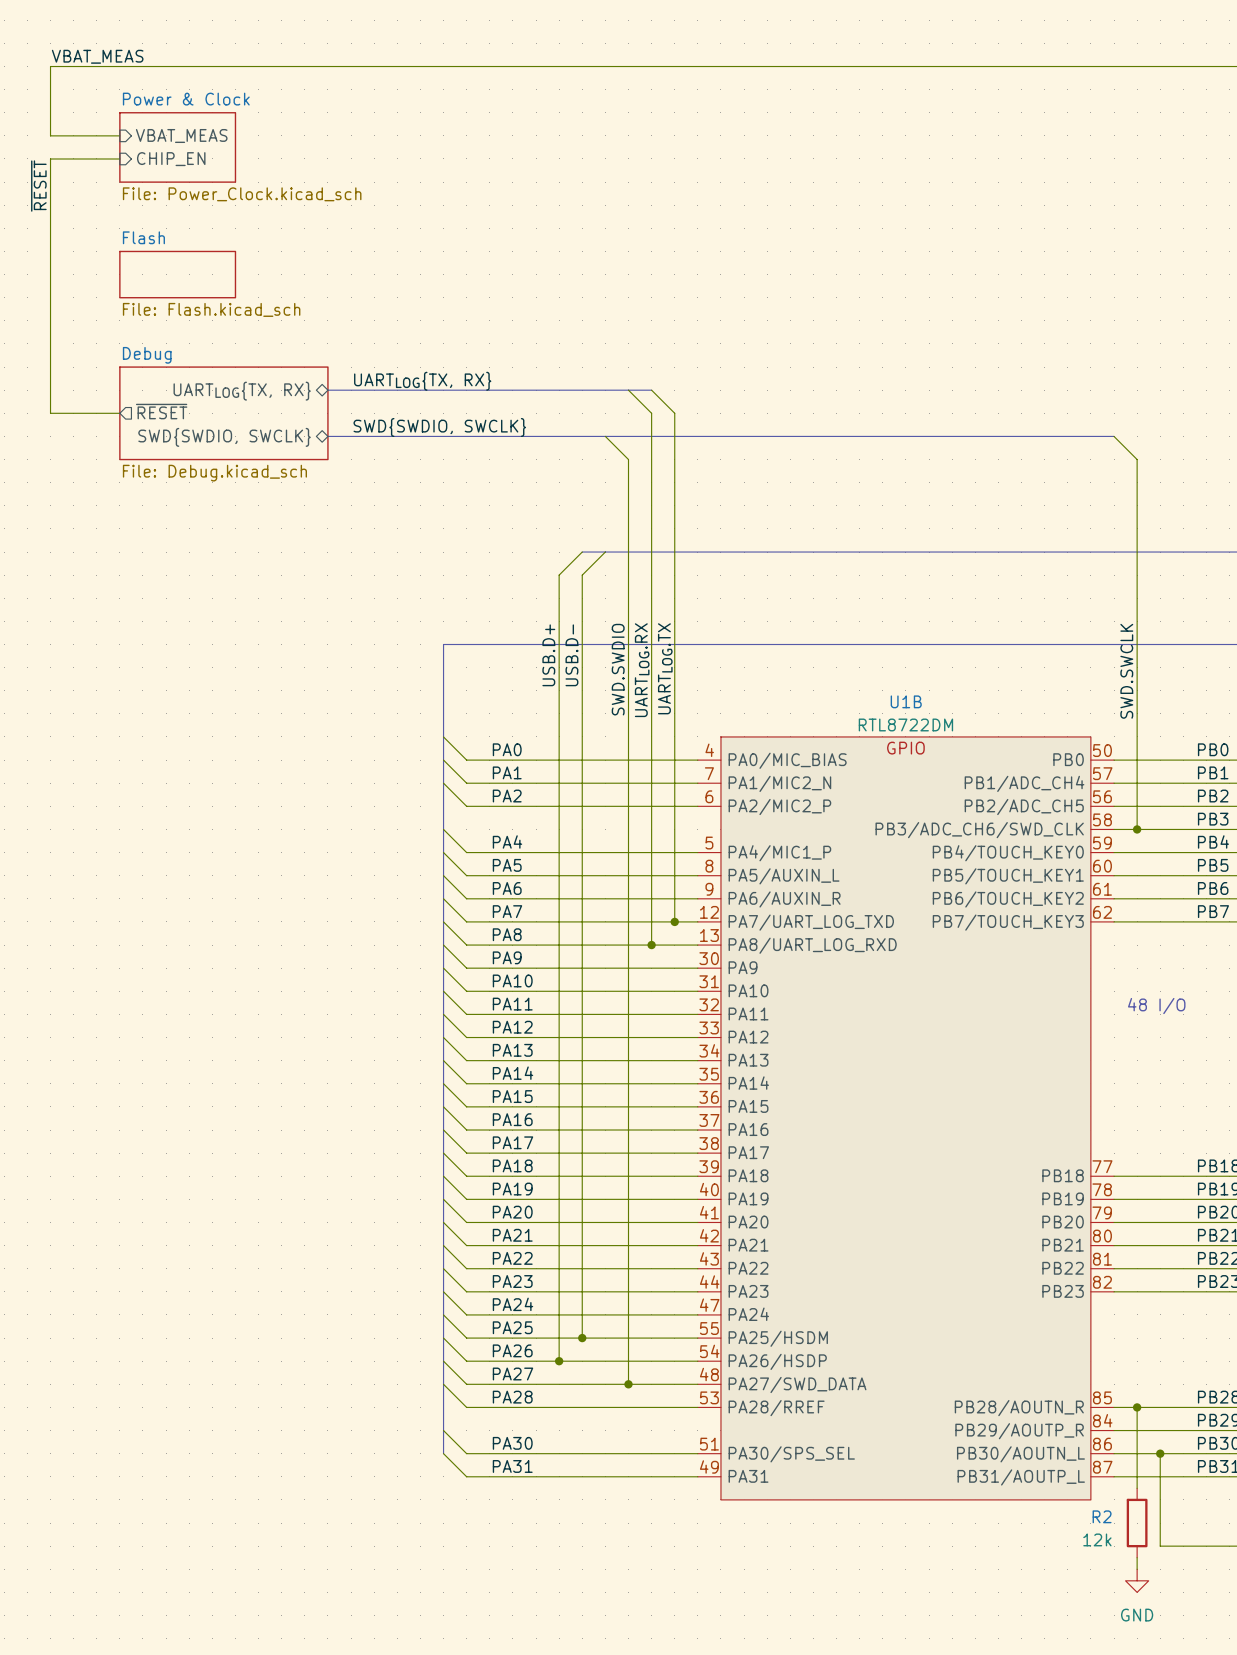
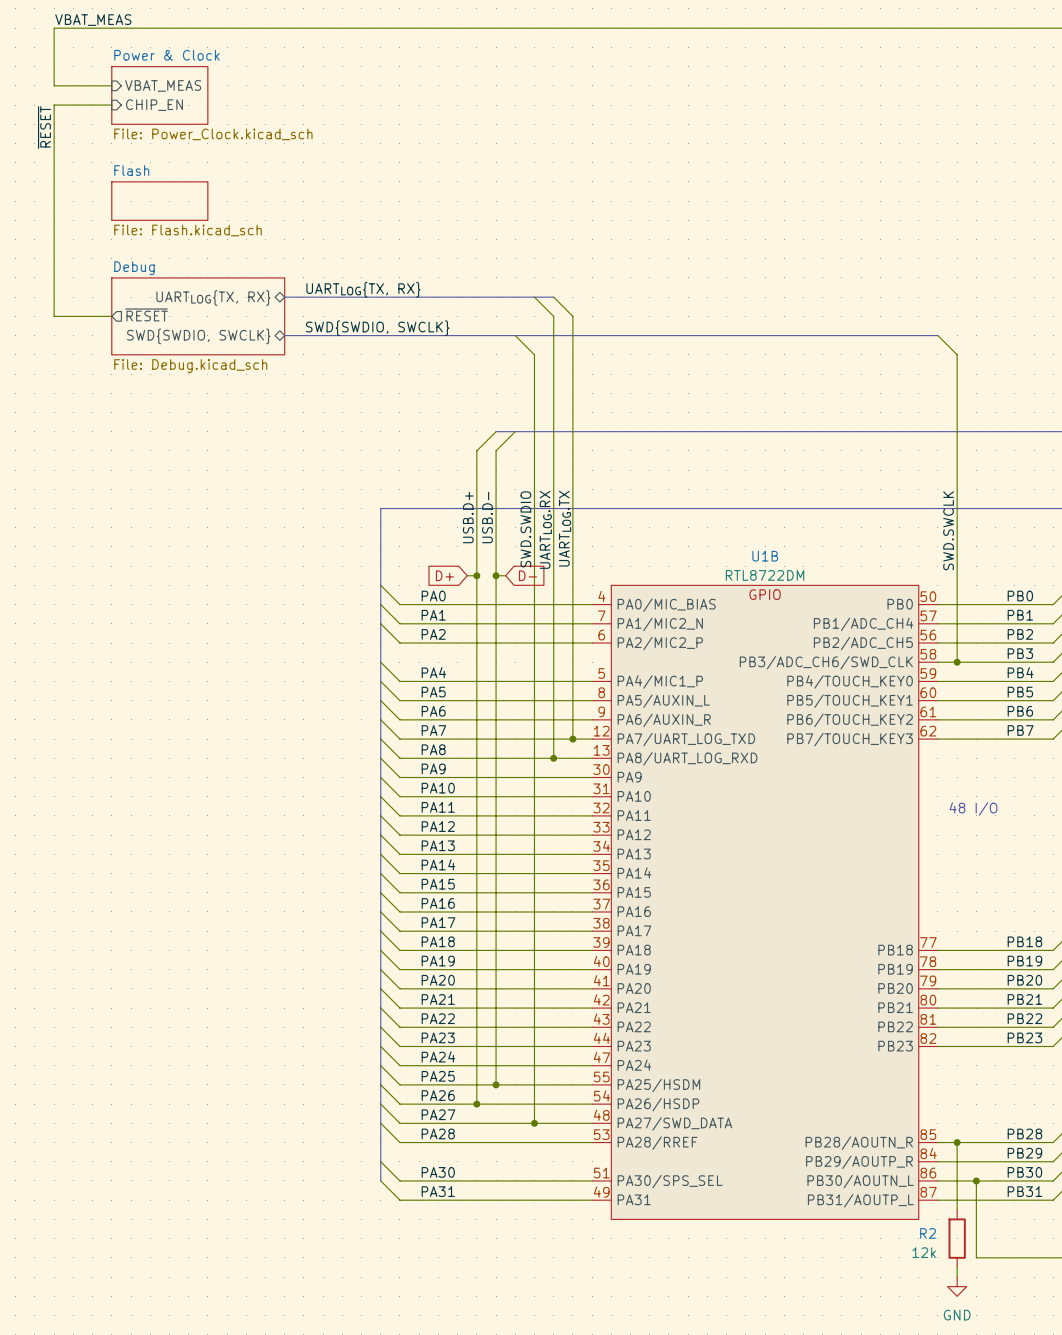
global label: none -> D+ (444, 575)
wire: none -> (467, 575) (476, 575)
junction: none -> (476, 575)
wire: none -> (496, 575) (505, 575)
junction: none -> (496, 575)
global label: none -> D- (527, 575)

